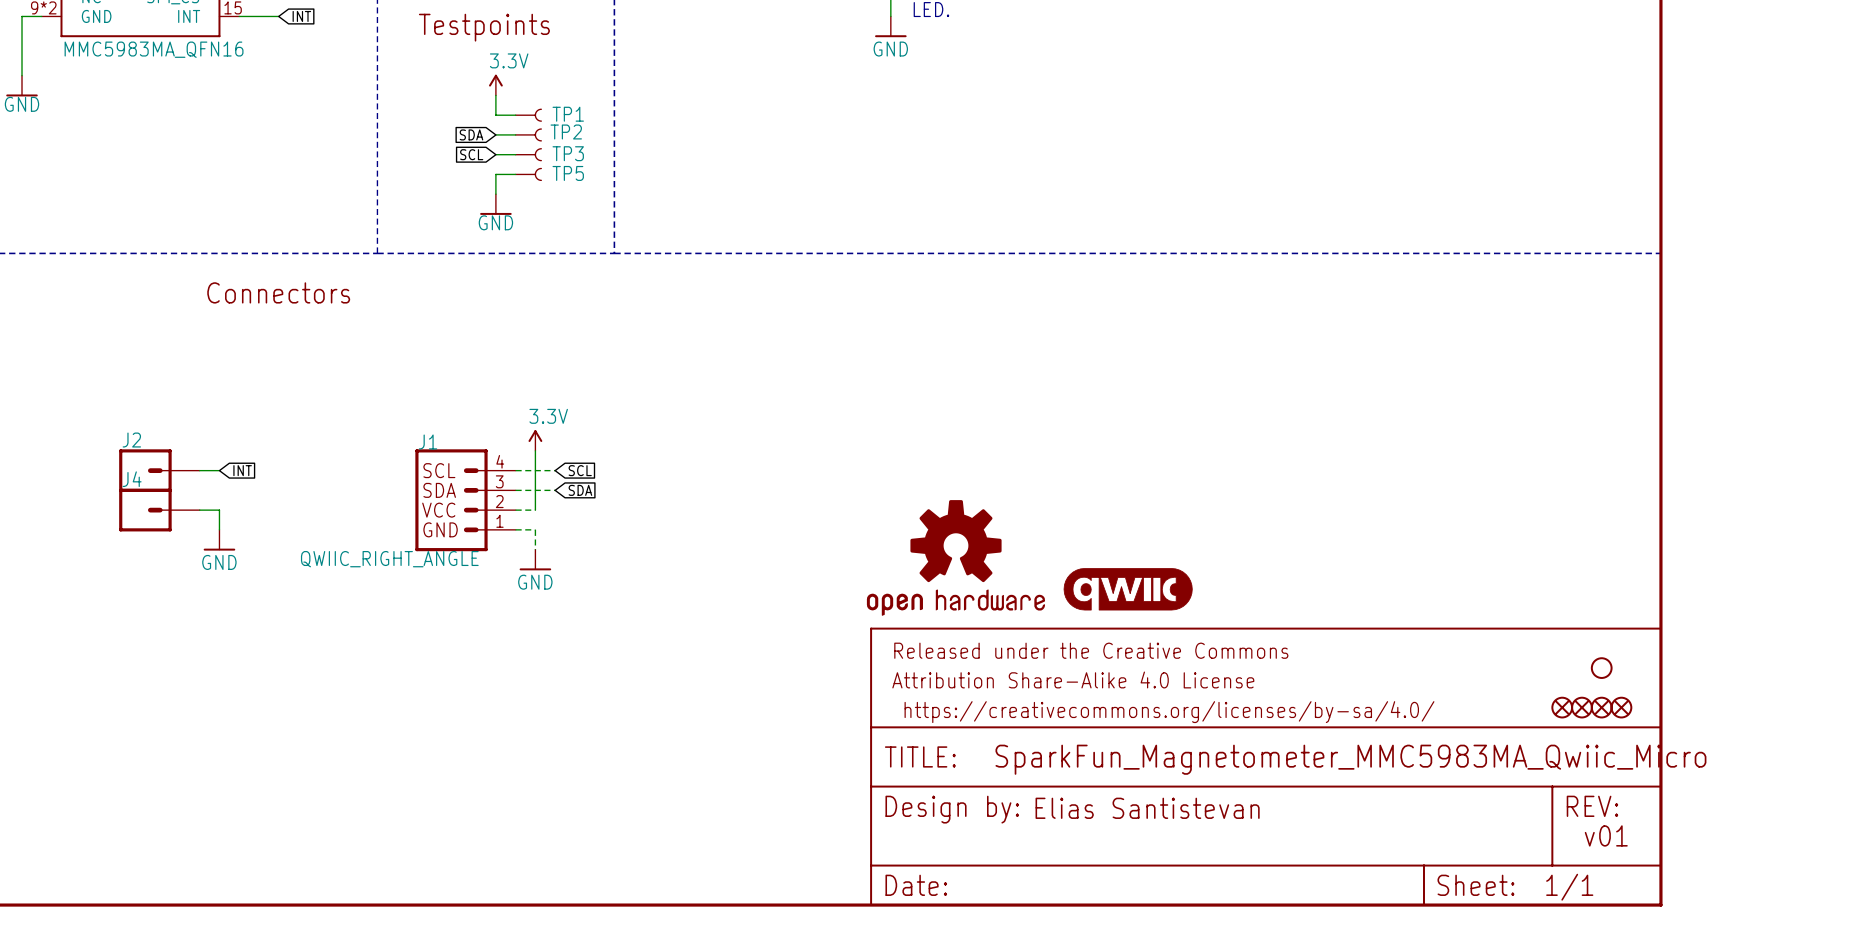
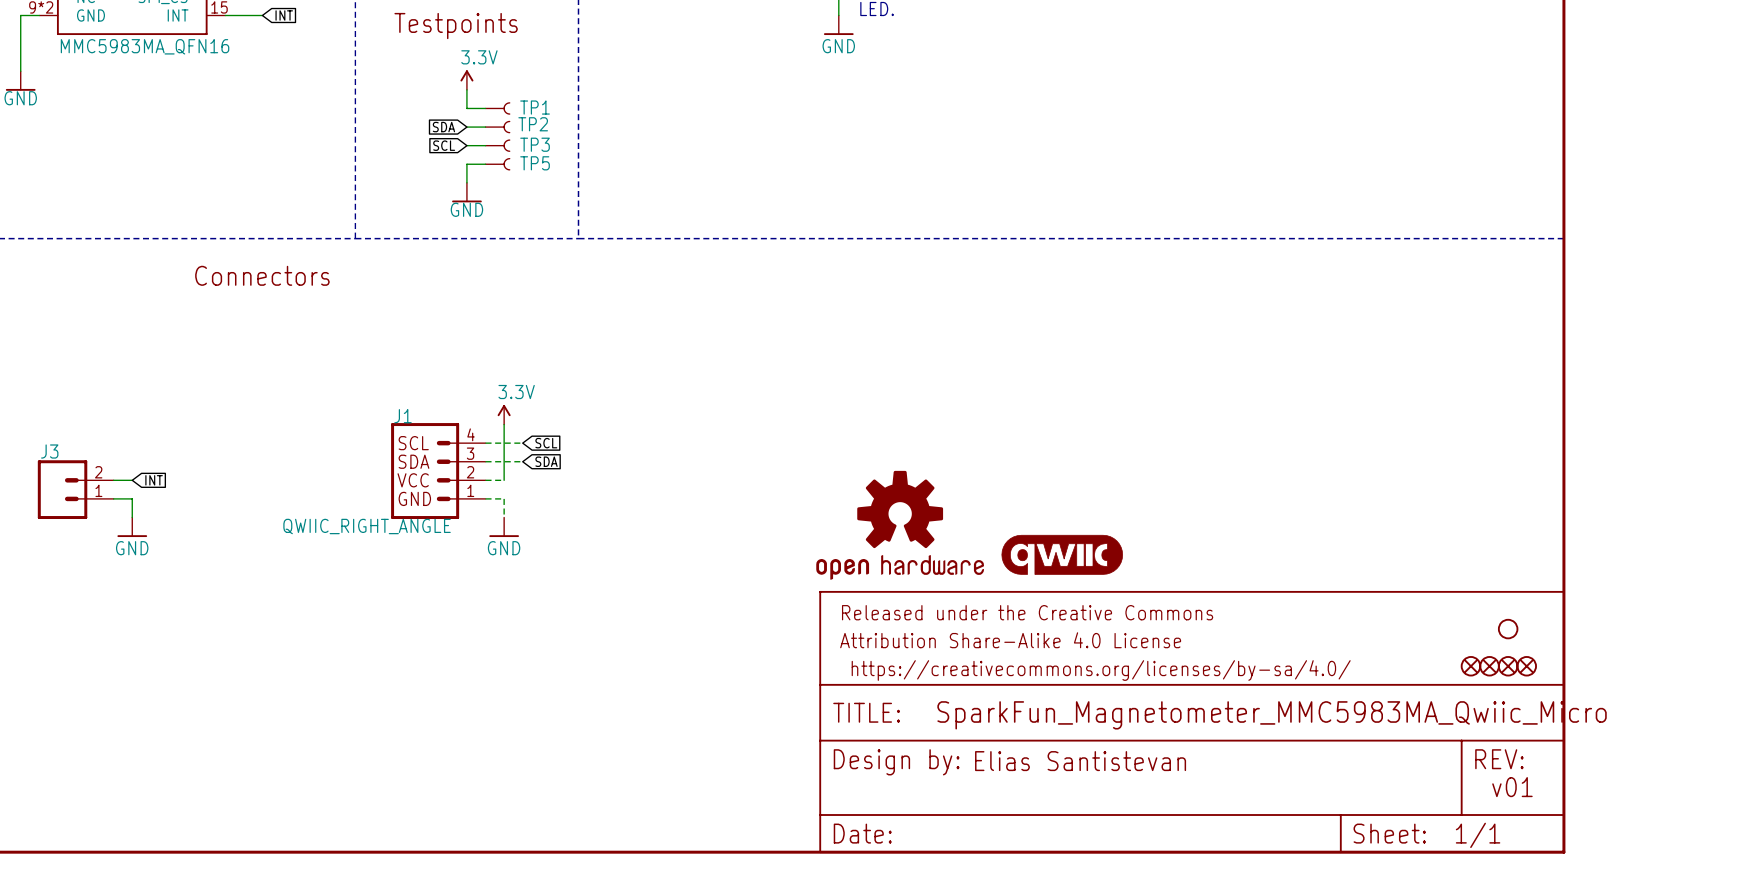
J2: (159, 470) -> none
wire: (199, 470) (219, 470) -> (113, 480) (132, 480)
global label position: INT (242, 470) -> INT (154, 480)
J4: (159, 510) -> none
wire: (199, 510) (219, 510) (219, 529) -> (113, 498) (132, 498) (132, 517)
J3: none -> (75, 489)
power symbol position: GND (219, 540) -> GND (132, 527)

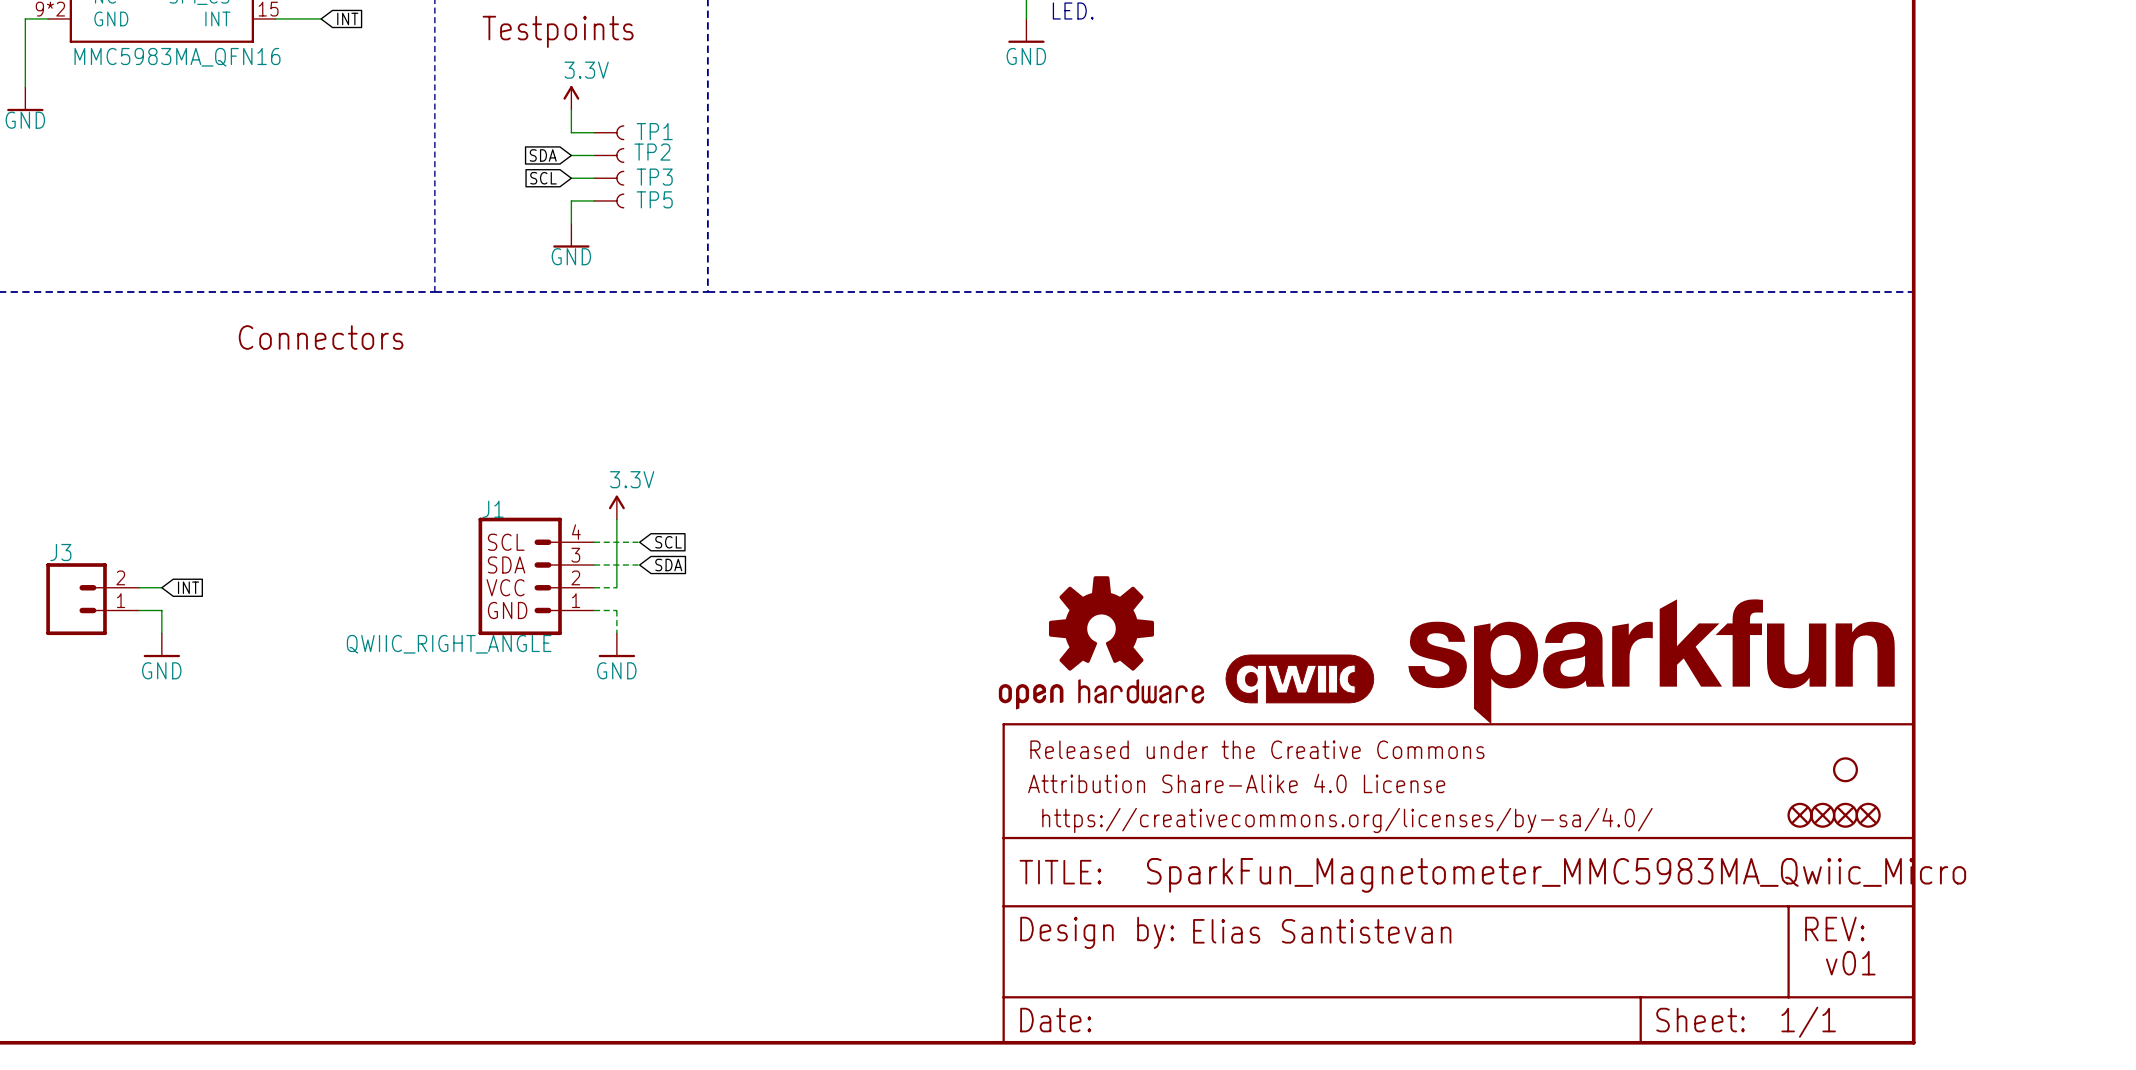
part: none -> (1651, 661)

